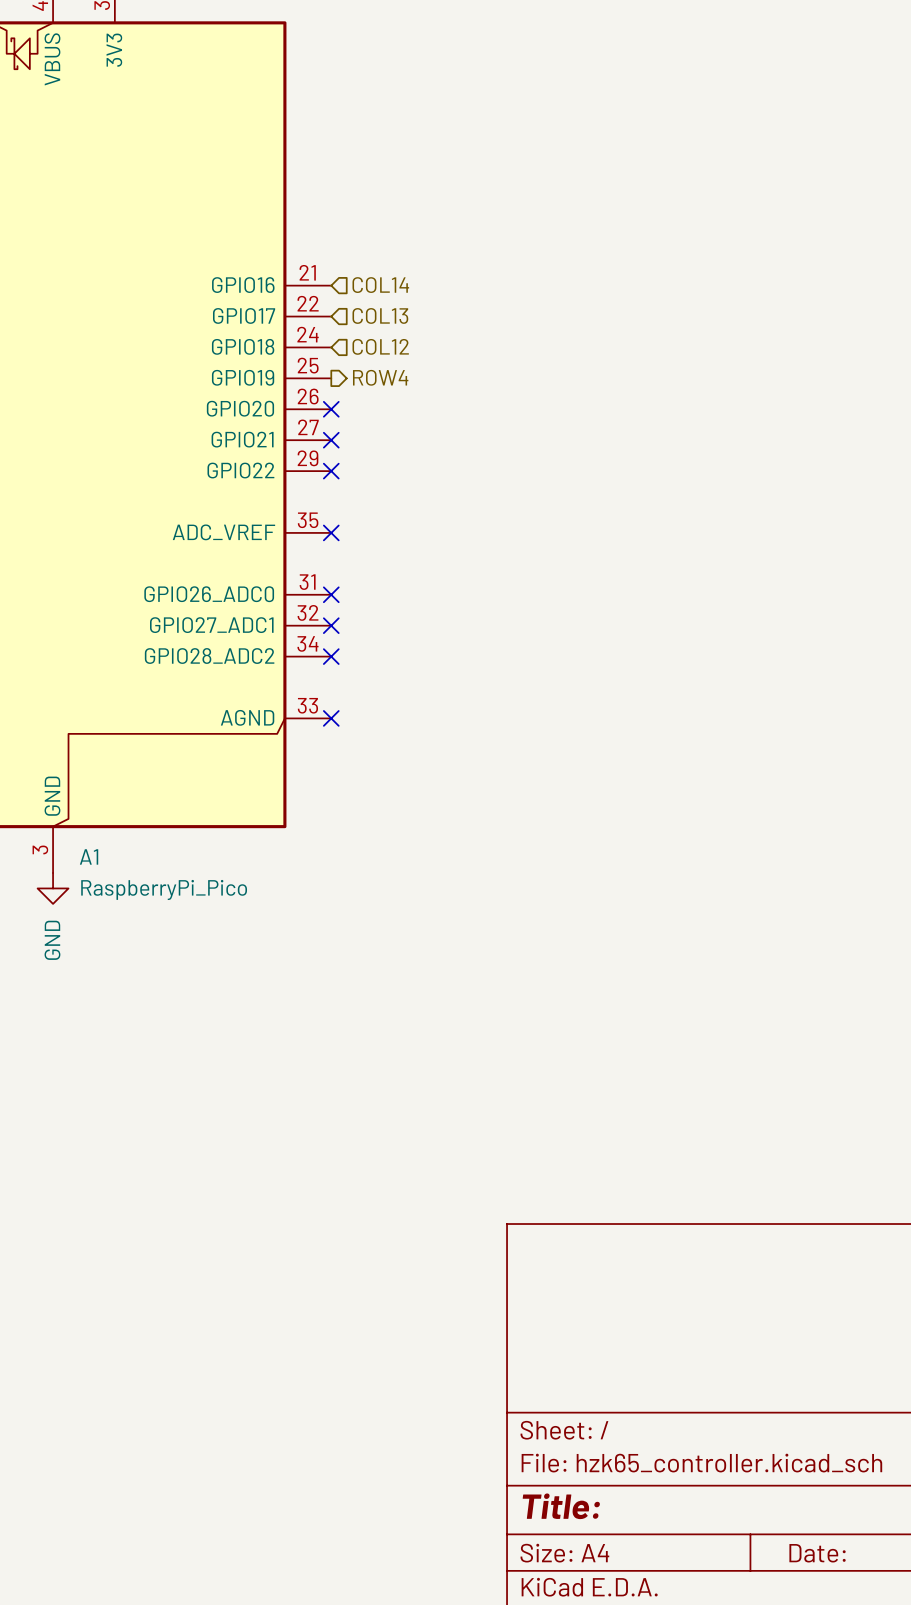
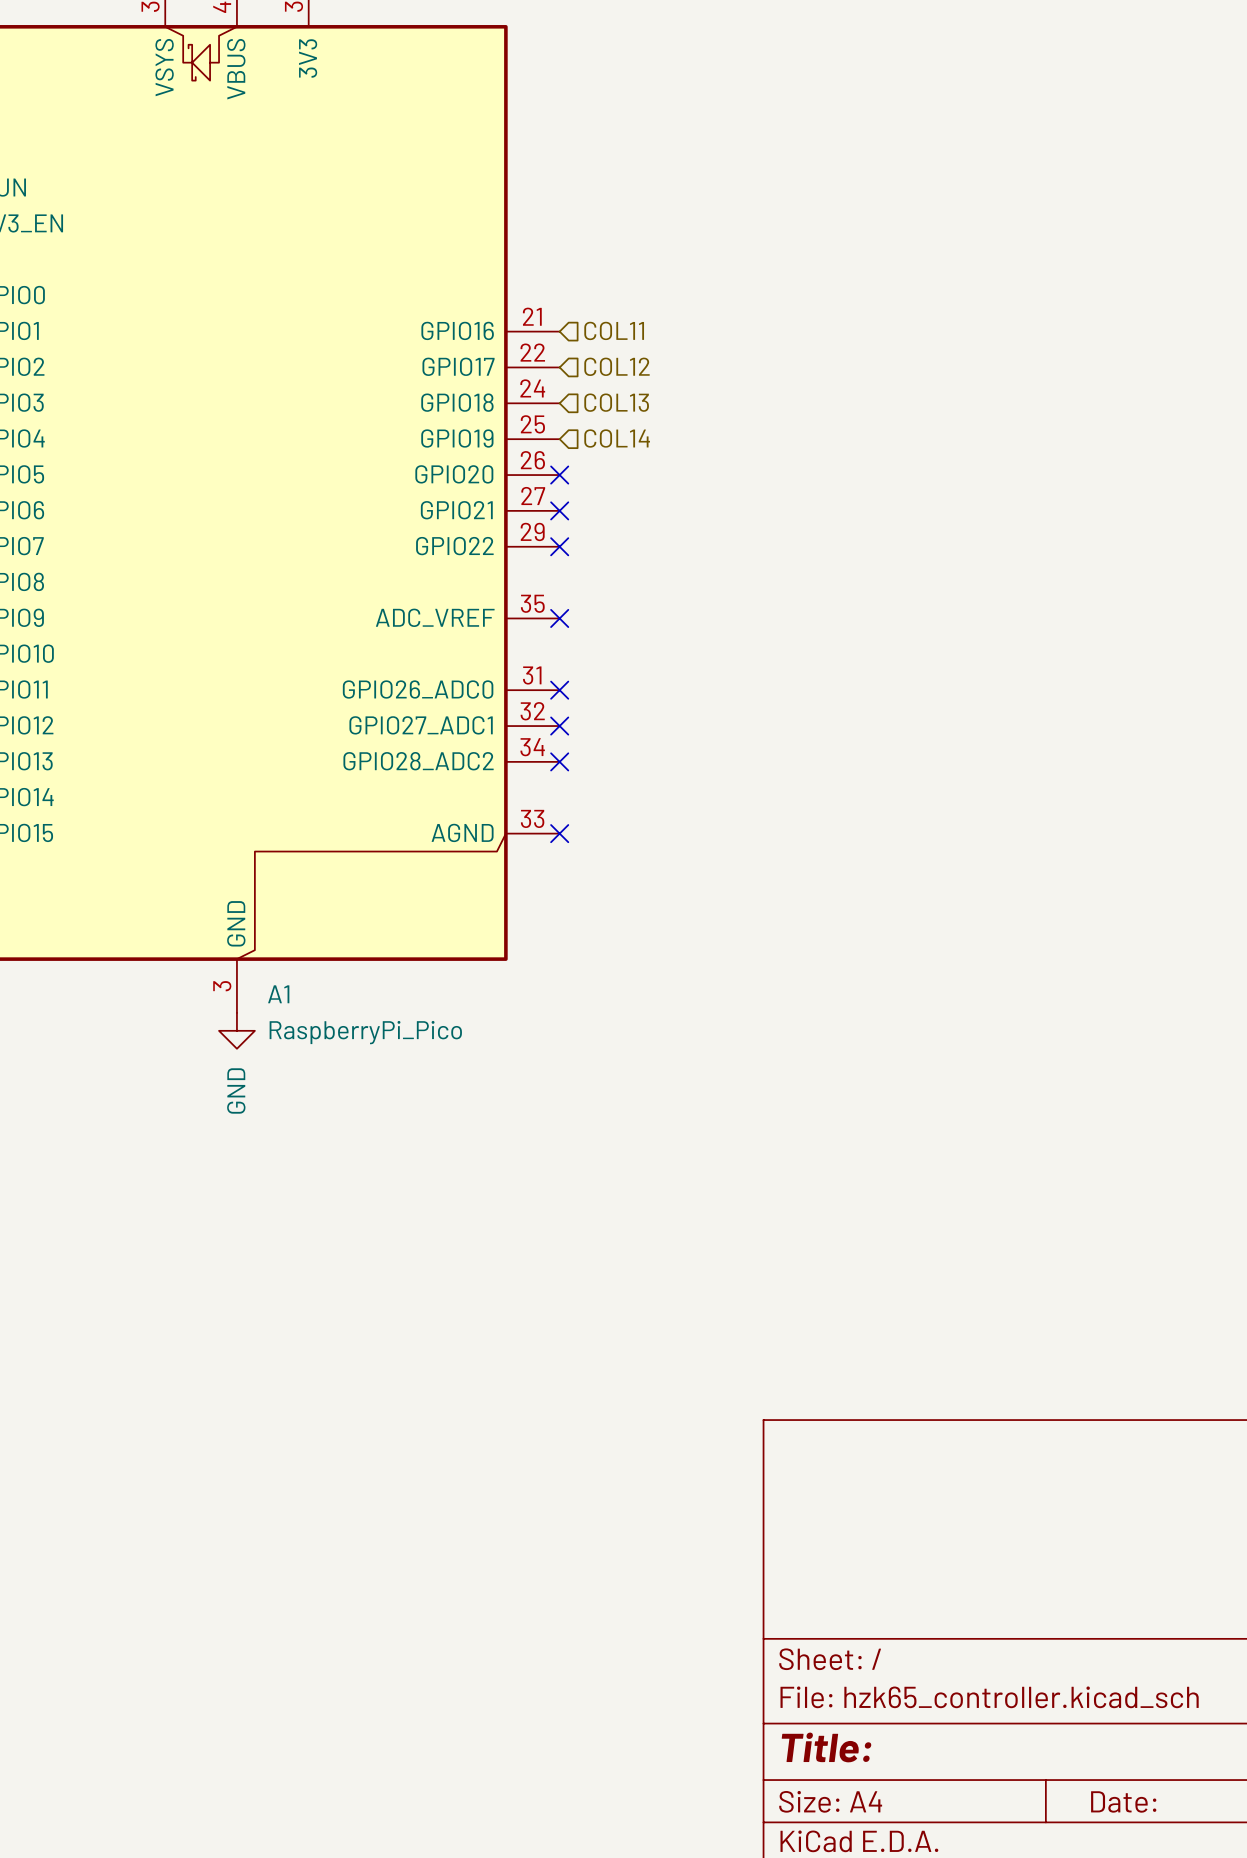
hierarchical label: COL14 (380, 285) -> COL11 (614, 330)
hierarchical label: COL13 (380, 315) -> COL12 (616, 366)
hierarchical label: COL12 (380, 346) -> COL13 (616, 402)
hierarchical label shape: output (380, 377) -> input (617, 438)
hierarchical label: ROW4 (380, 377) -> COL14 (617, 438)

